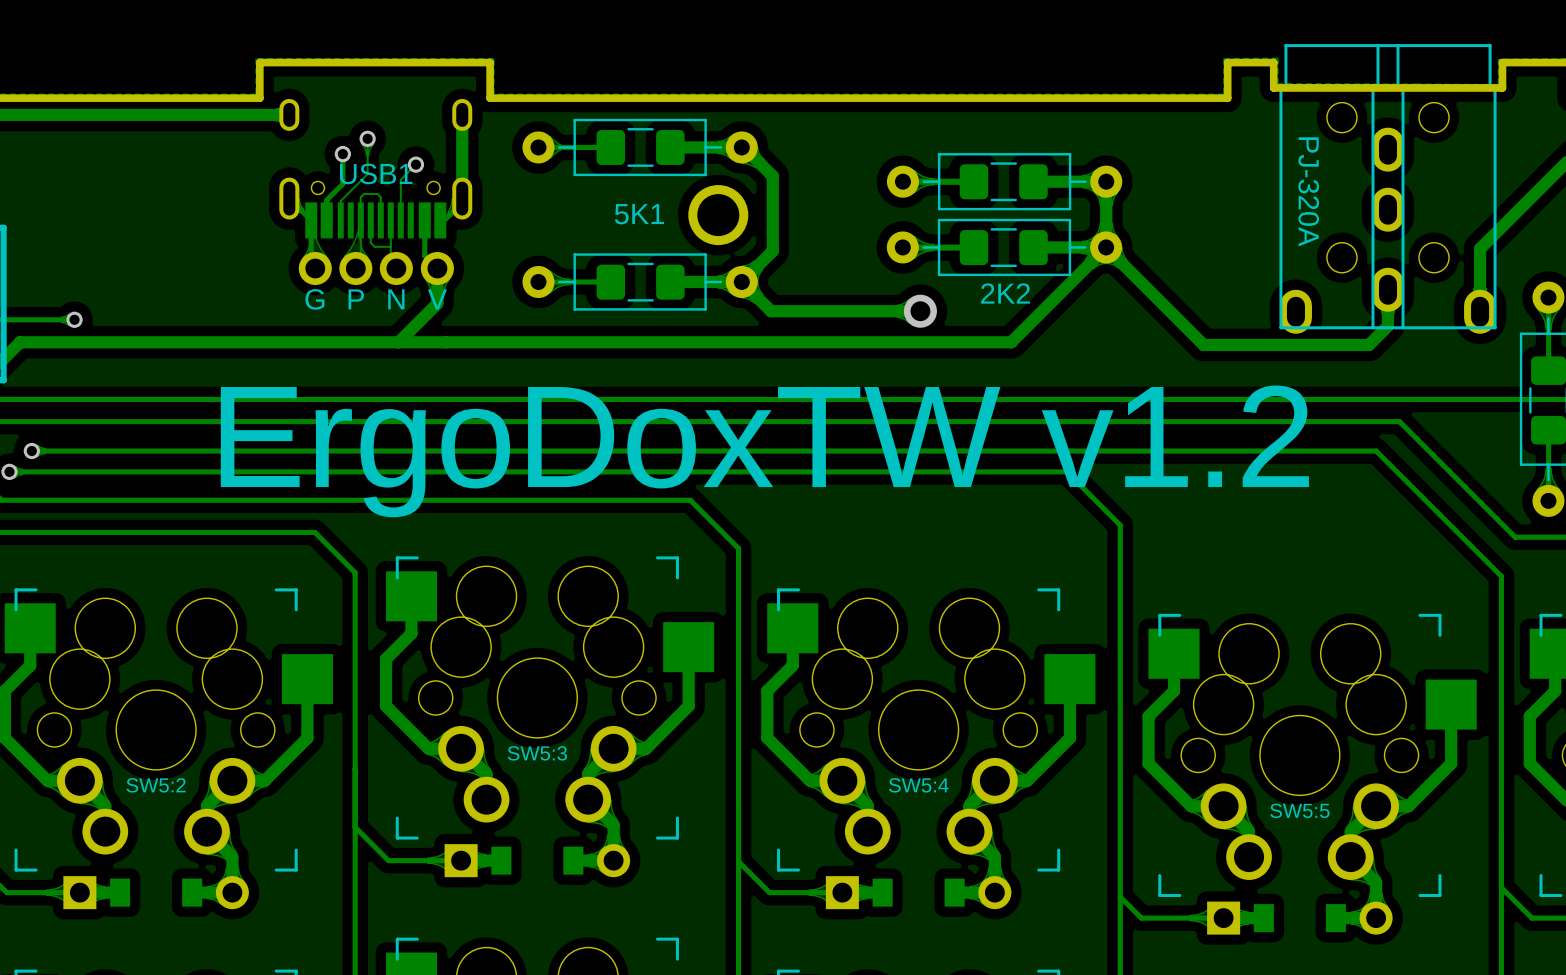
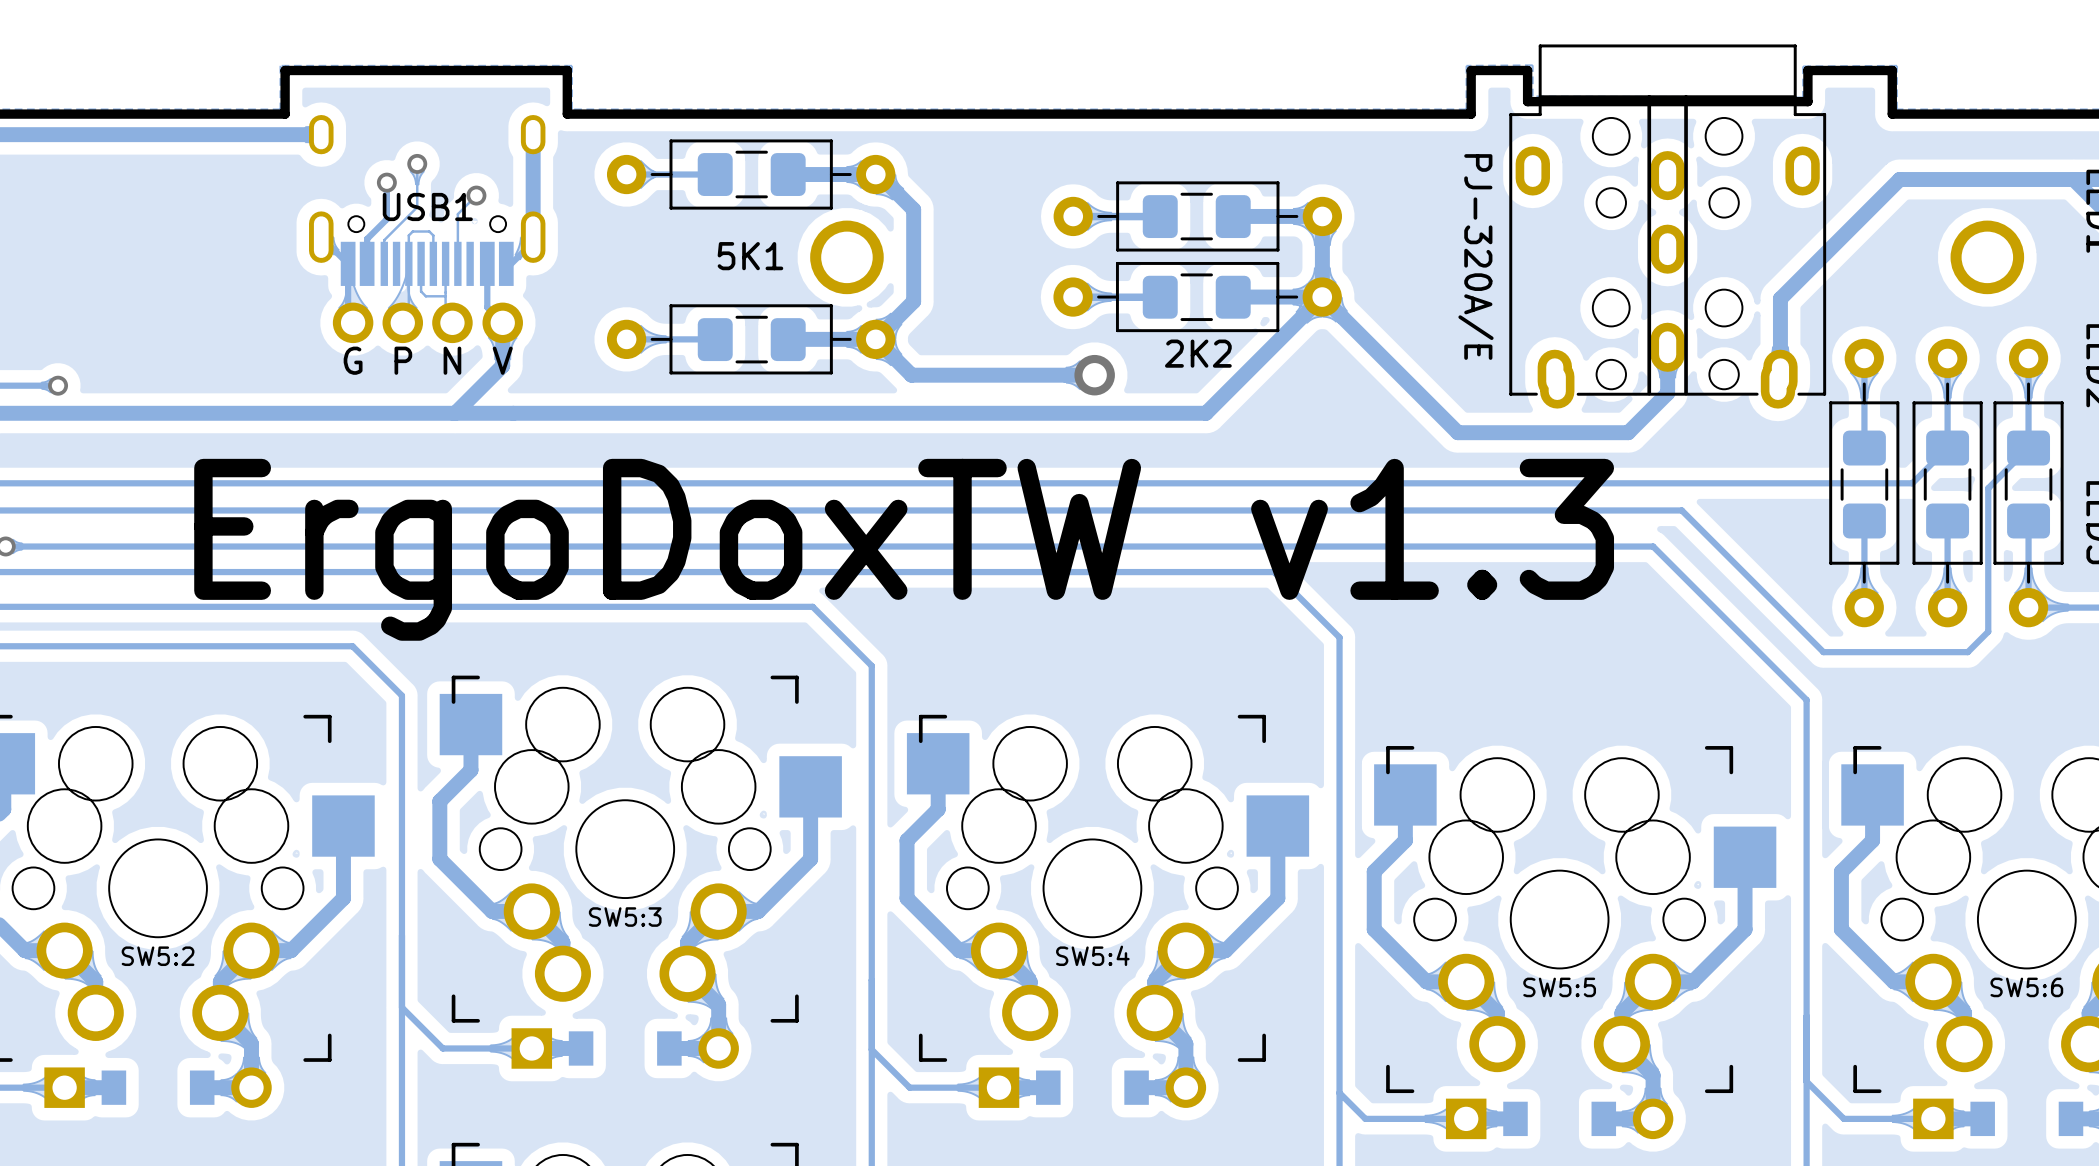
part footprint: [1279, 44, 1497, 334] -> [1509, 44, 1827, 409]
track: (1369, 344) (1203, 344) -> (1644, 416) (1628, 432) (1457, 432) (1441, 416)
text: ErgoDoxTW v1.2 (764, 451) -> ErgoDoxTW v1.3 (904, 549)

